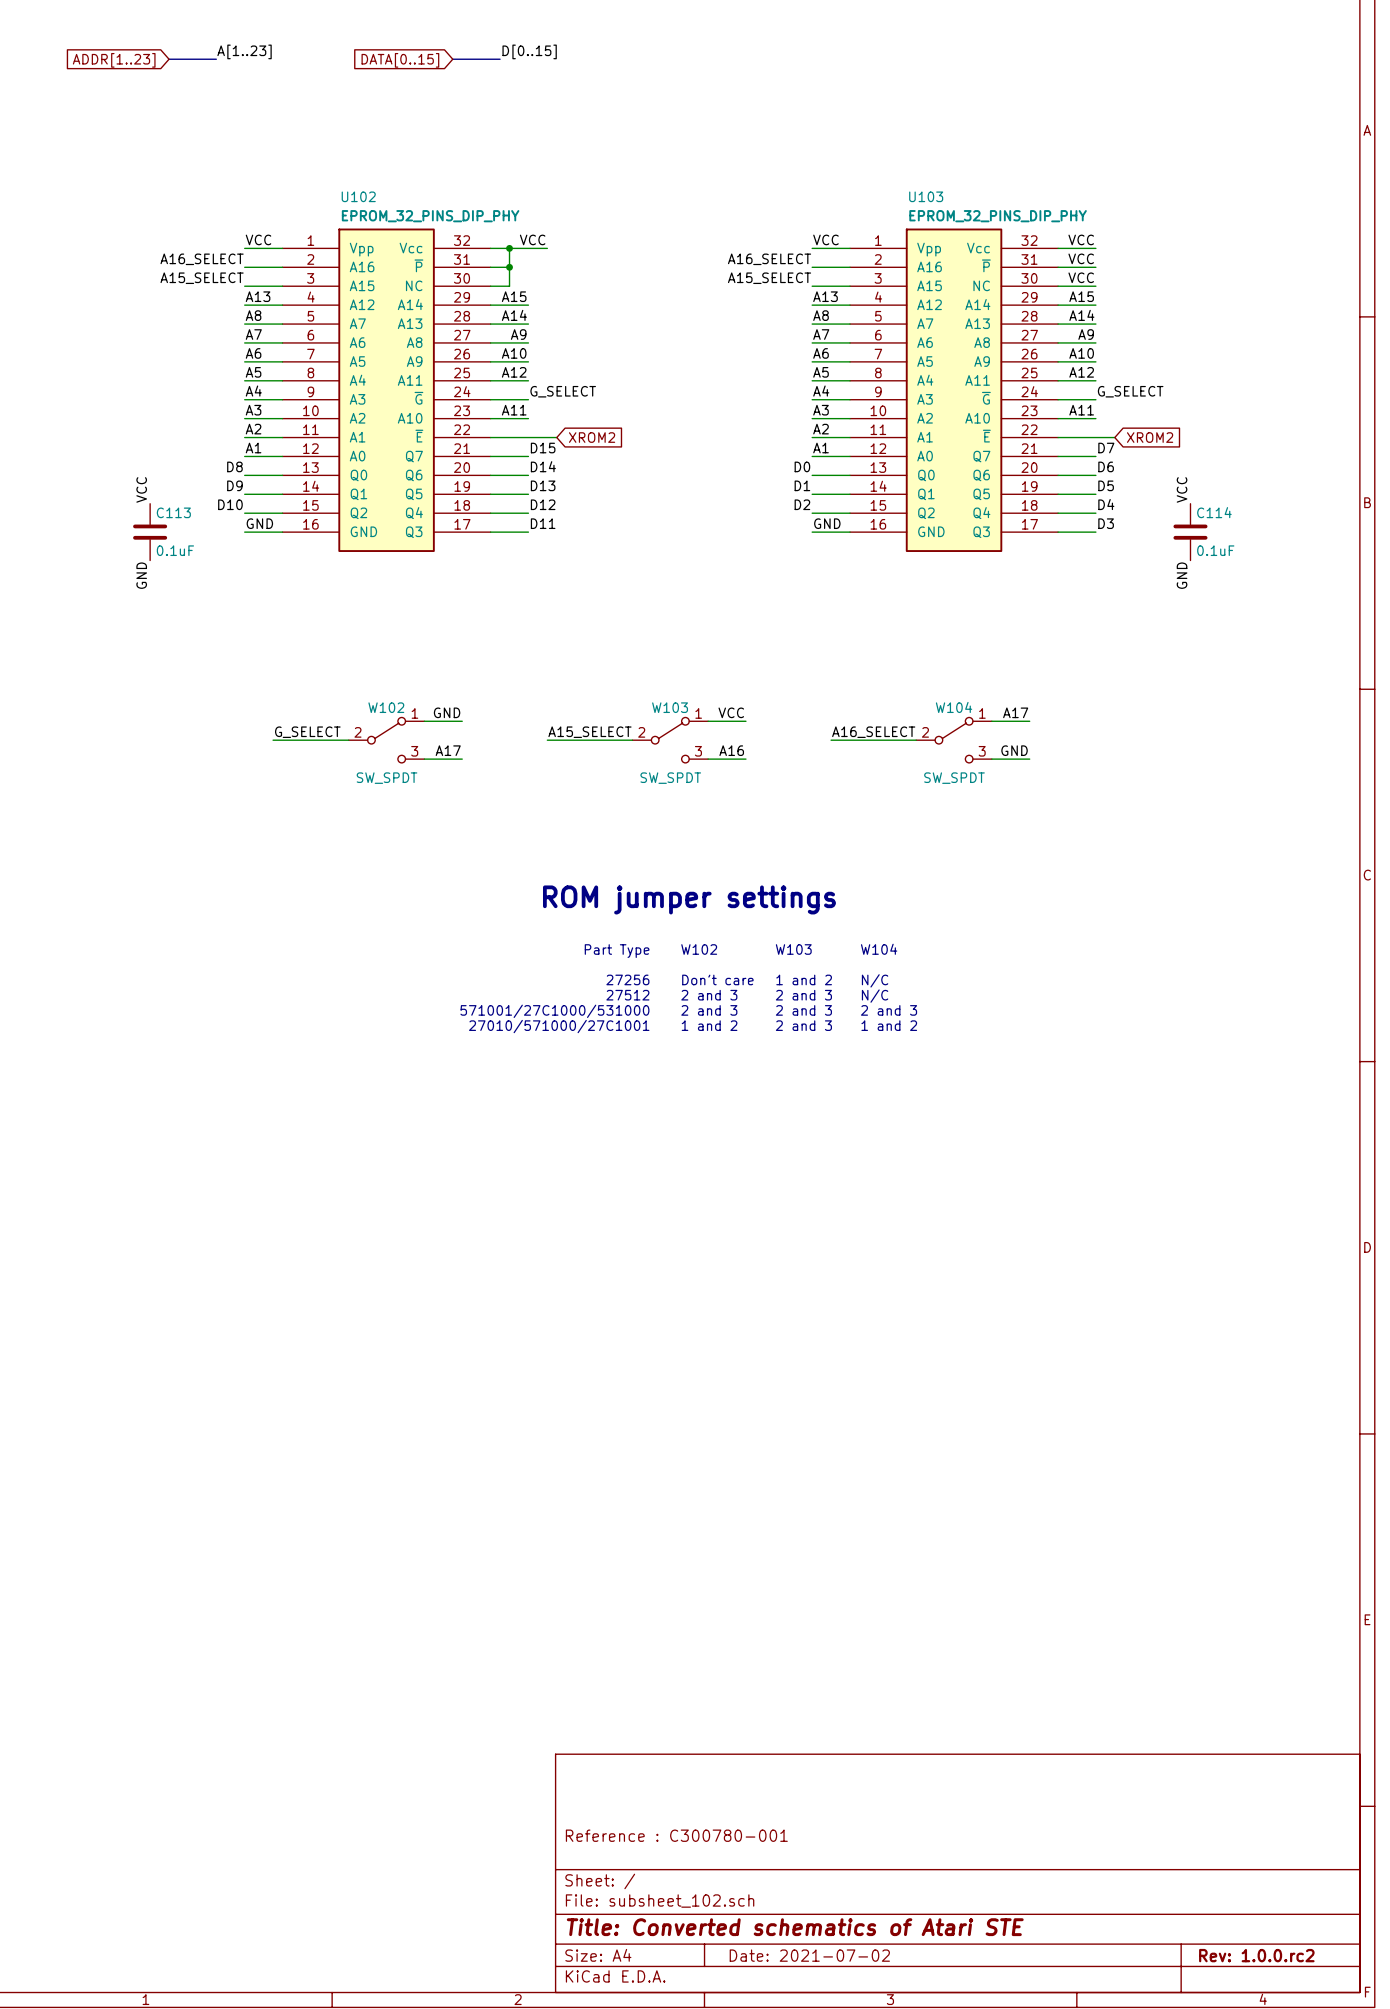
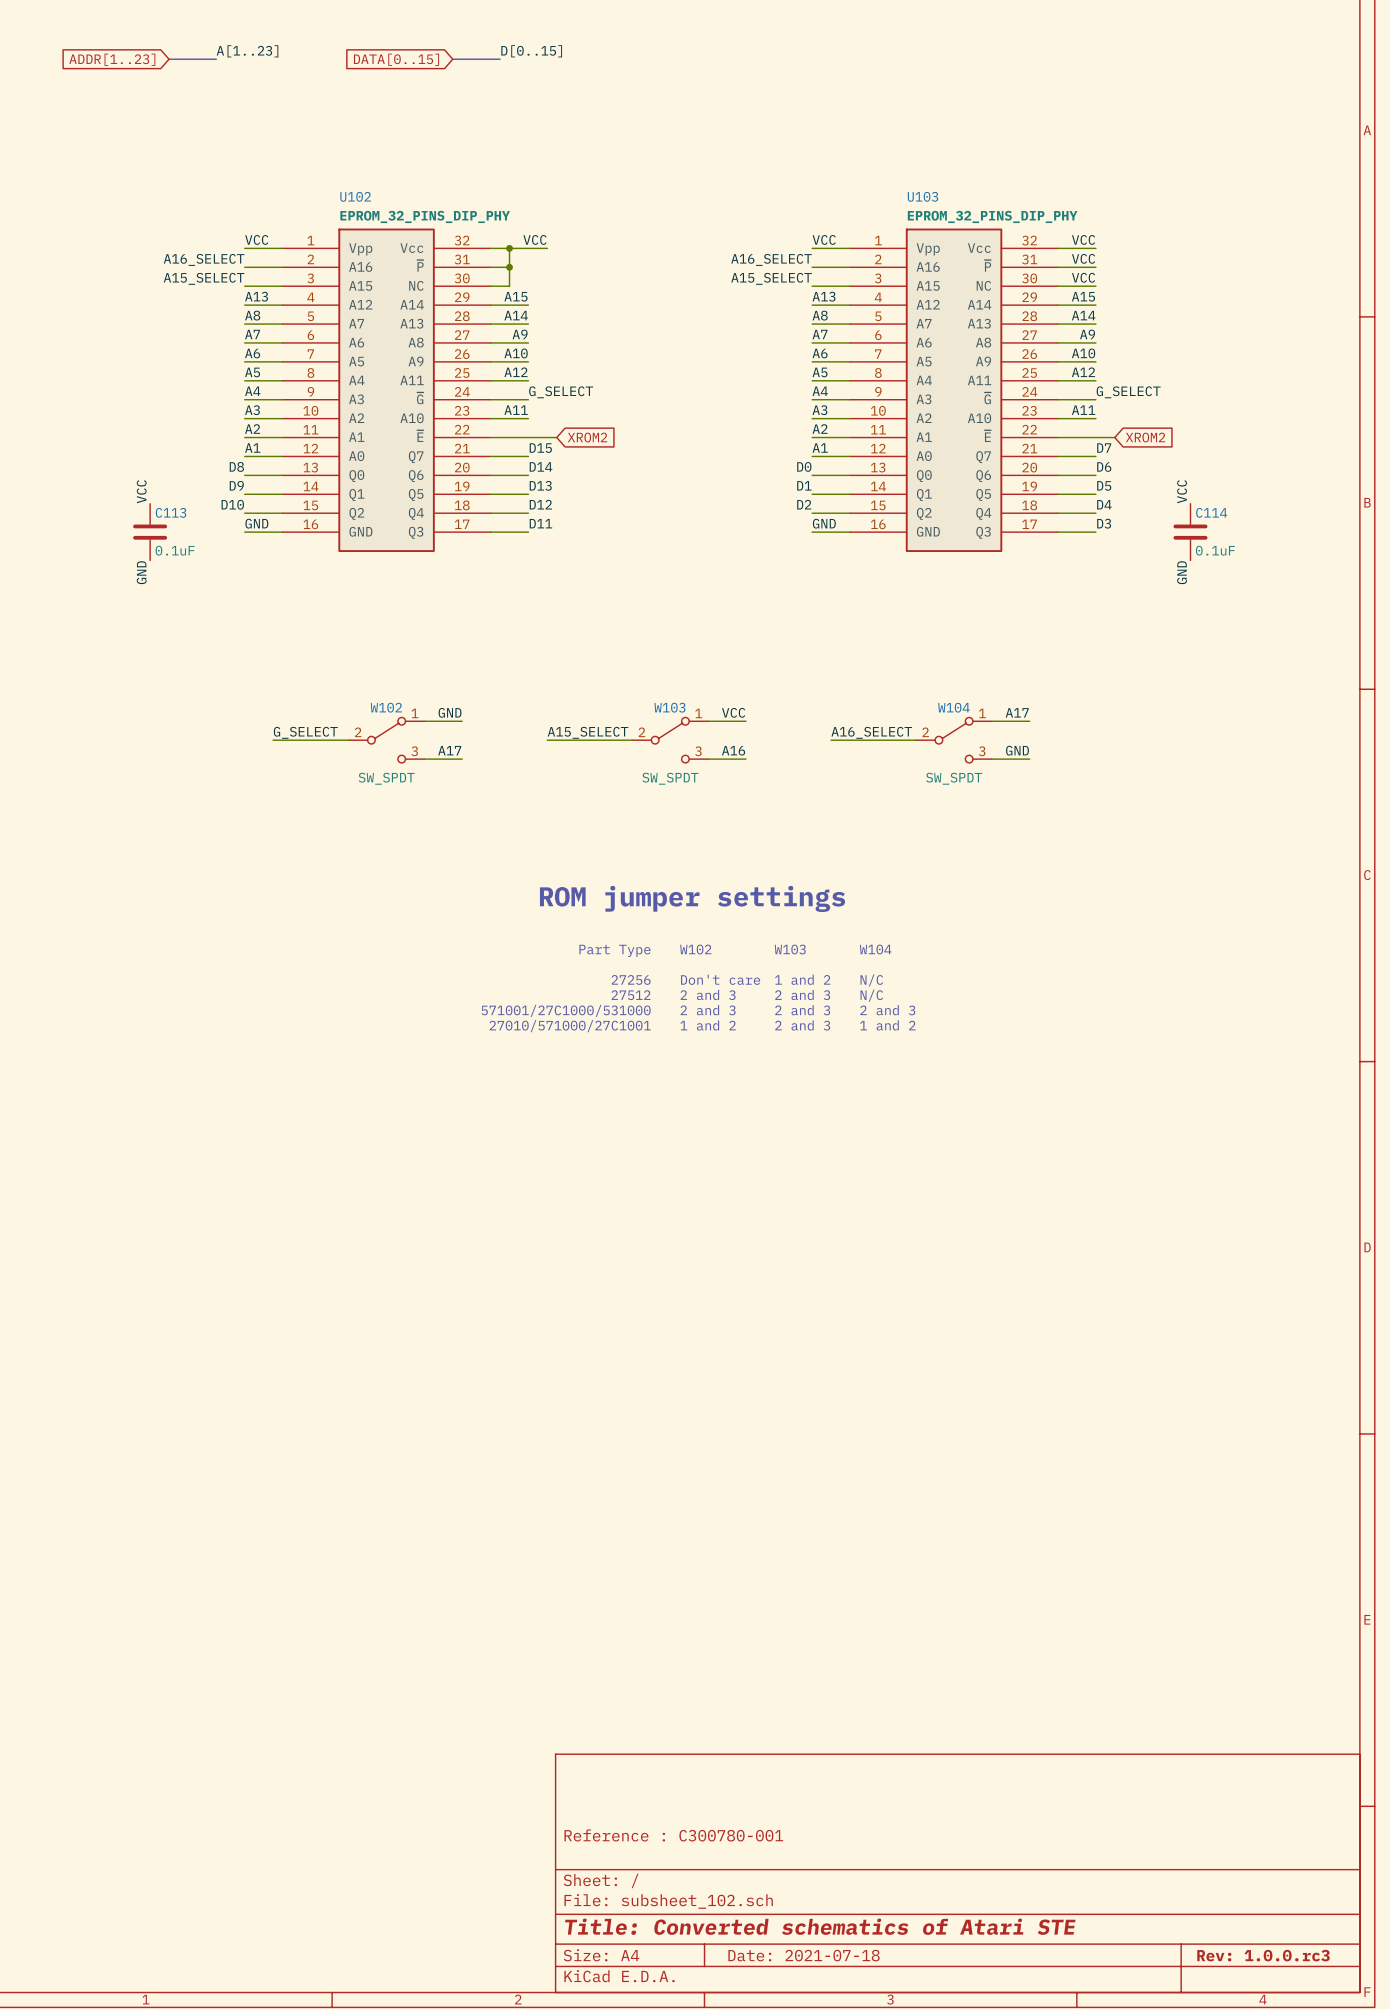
title block: Date: 2021-07-02 (809, 1955) -> Date: 2021-07-18 (804, 1955)
title block: Rev: 1.0.0.rc2 (1256, 1955) -> Rev: 1.0.0.rc3 (1263, 1955)

